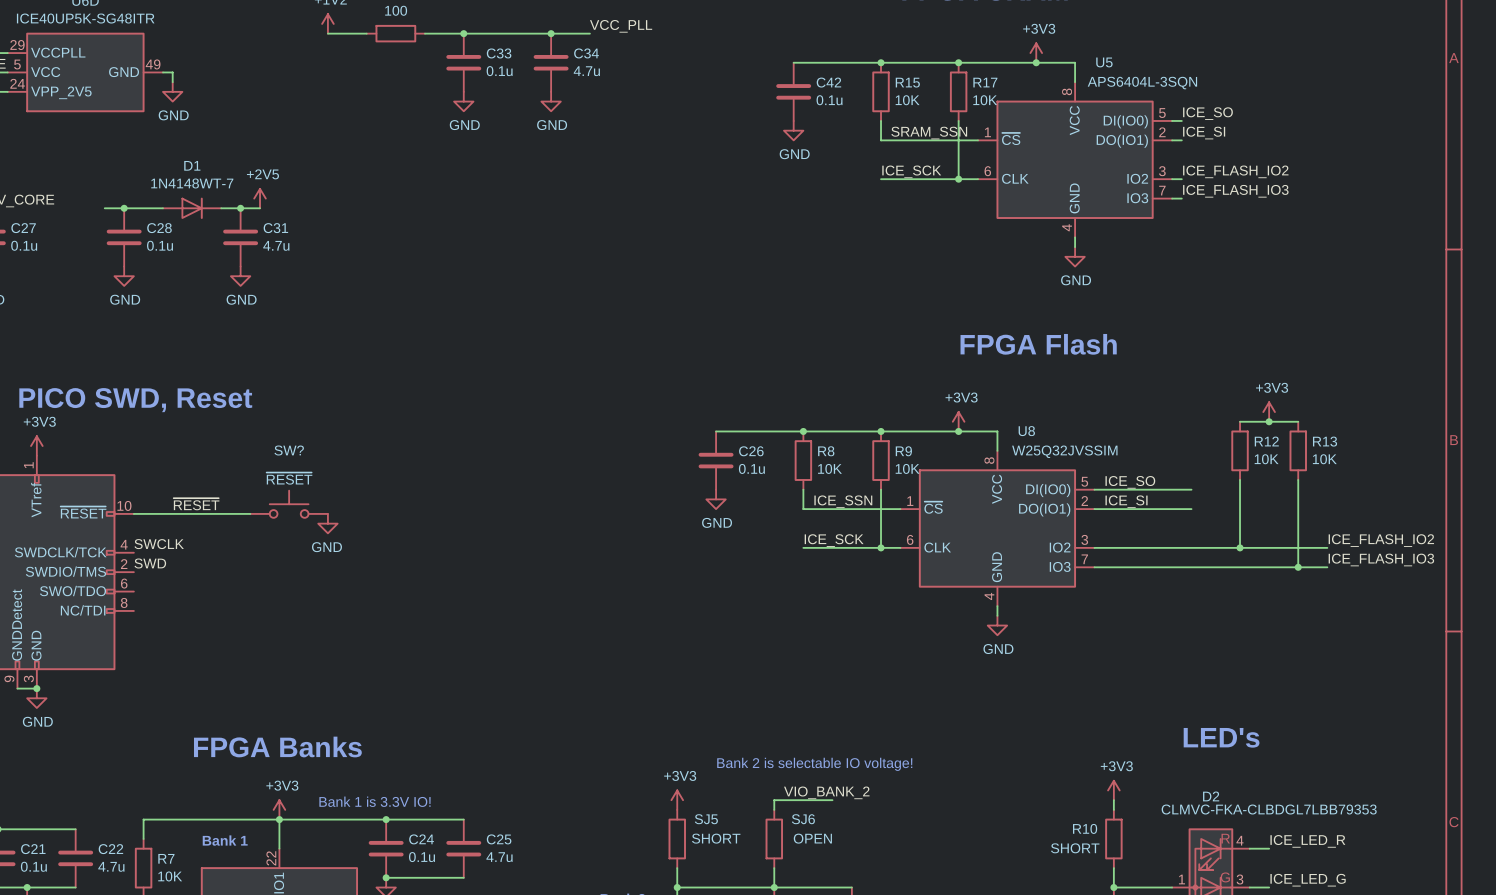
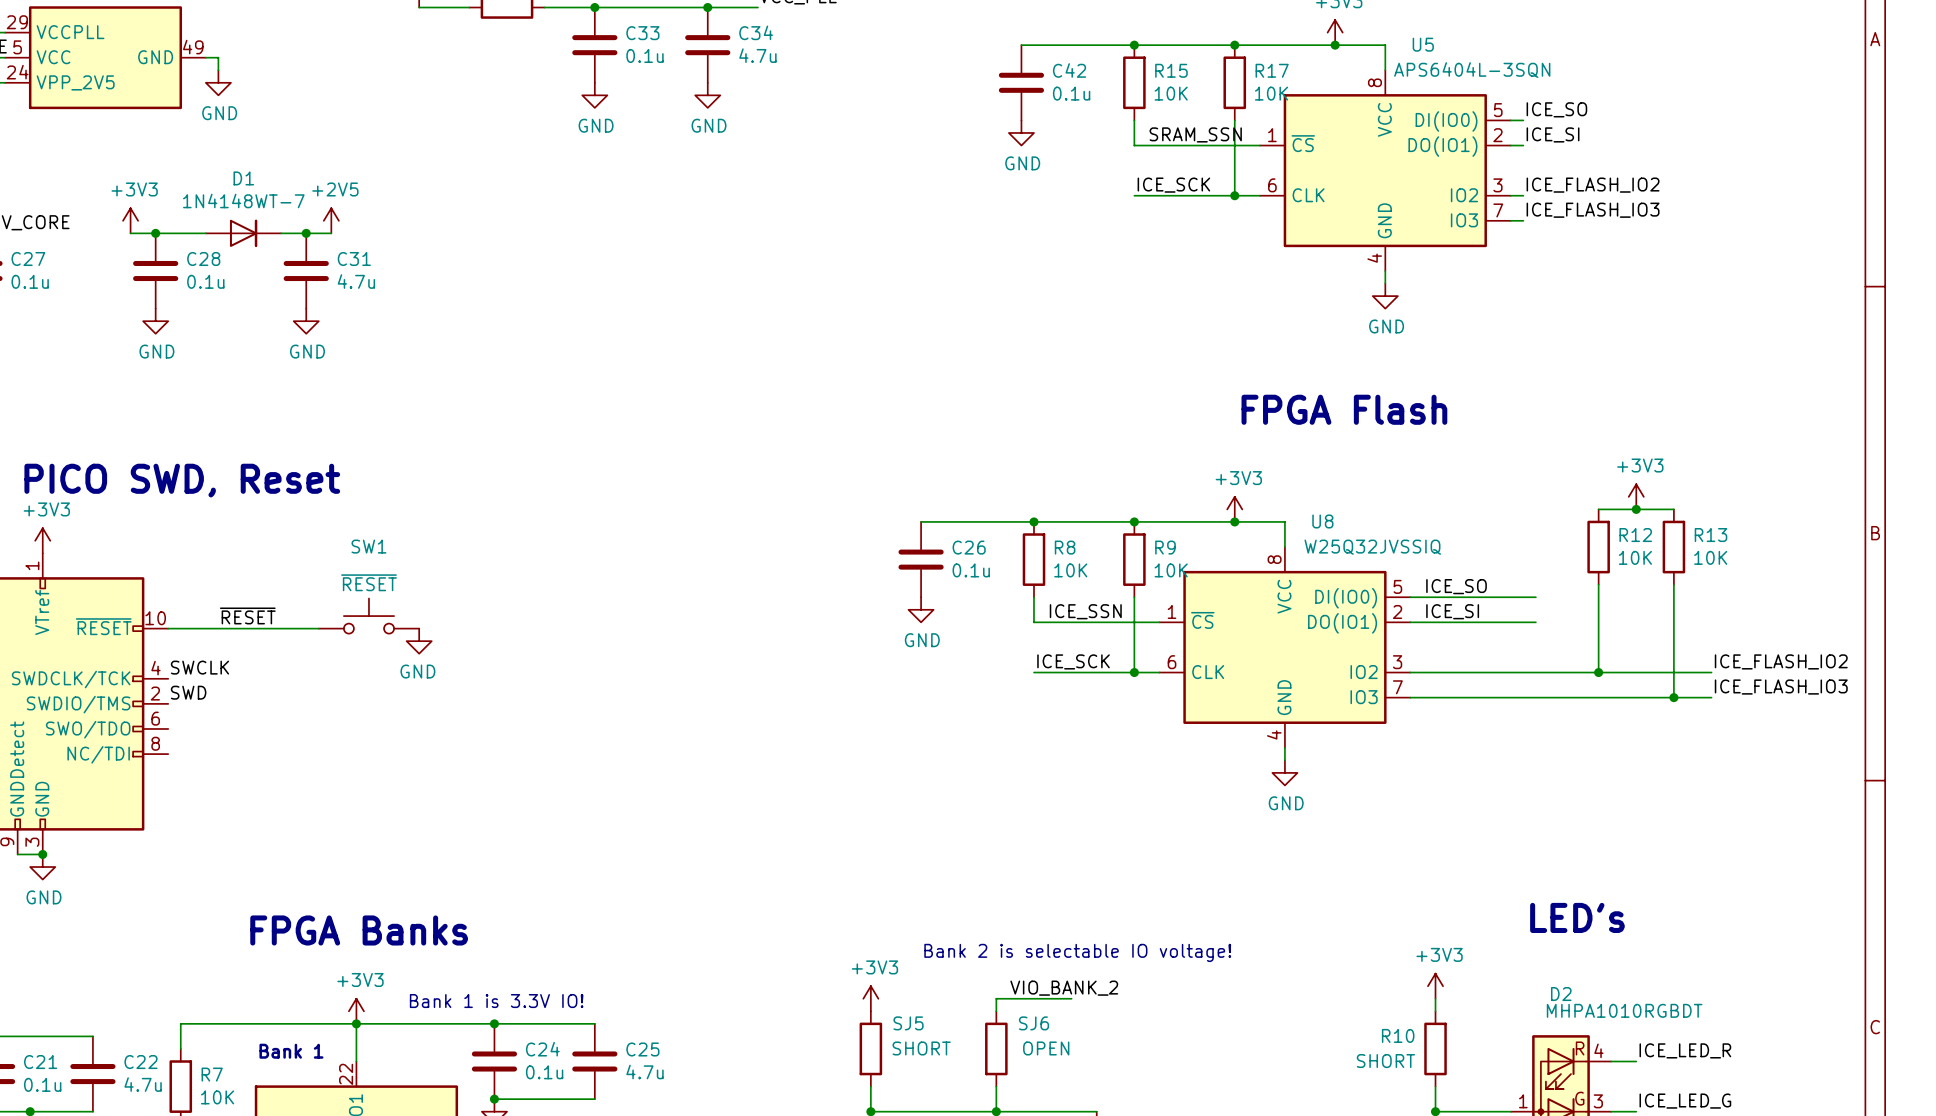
power symbol: none -> +3V3 (130, 220)
SW? name: SW? (289, 450) -> SW1 (368, 546)
U8 value: W25Q32JVSSIM (1064, 451) -> W25Q32JVSSIQ (1372, 547)
D2 value: CLMVC-FKA-CLBDGL7LBB79353 (1269, 809) -> MHPA1010RGBDT (1624, 1010)

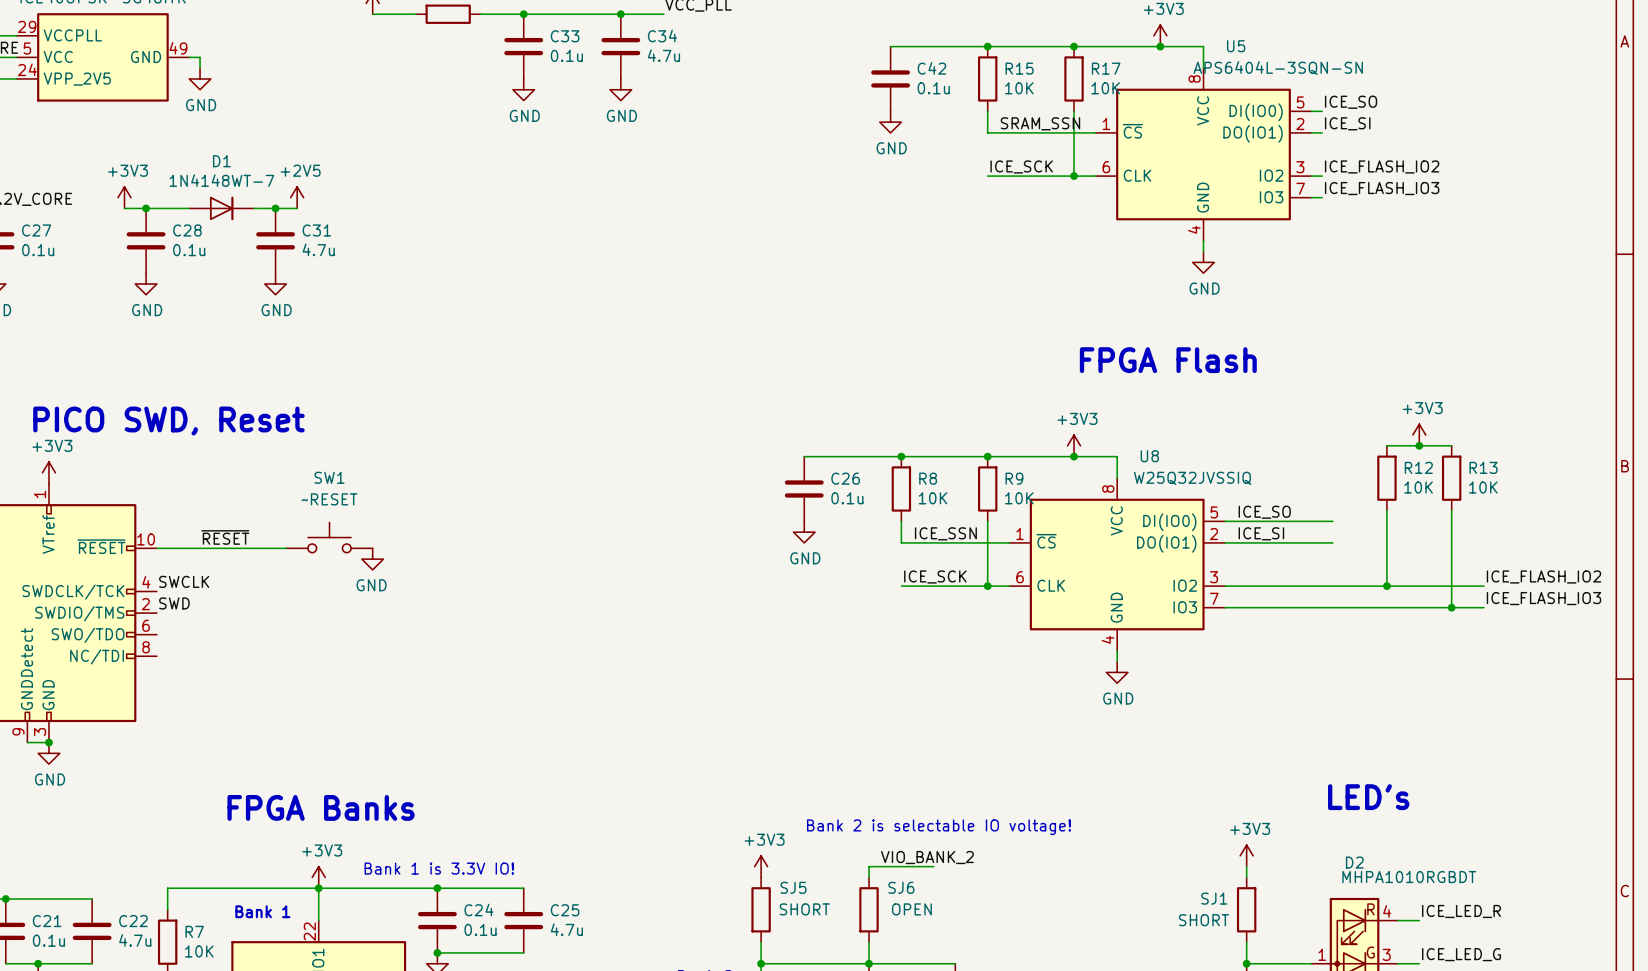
U5 value: APS6404L-3SQN (1472, 70) -> APS6404L-3SQN-SN (1278, 68)
SW1 text: none -> ~RESET (329, 499)
SW1 value: ~{RESET} (369, 582) -> none
R10 name: R10 (1398, 1035) -> SJ1 (1214, 898)

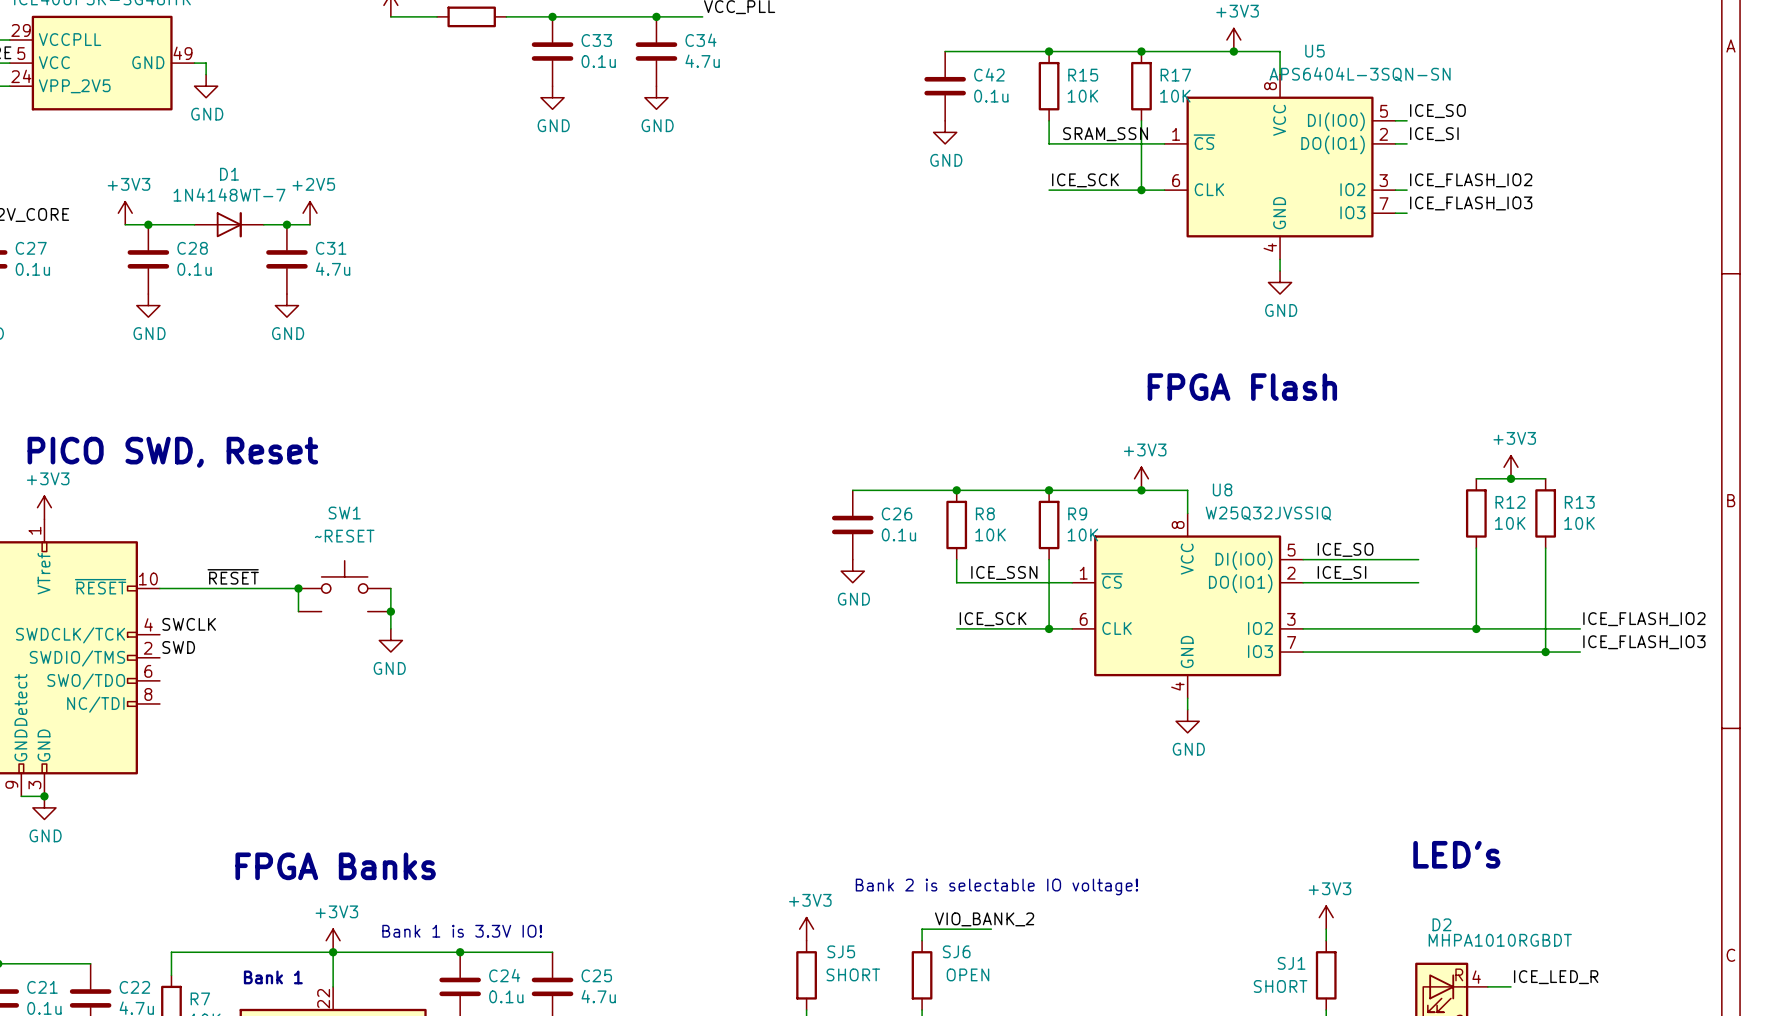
SW1 symbol: [286, 522, 373, 553] -> [298, 560, 391, 612]
wire: none -> (298, 588) (298, 611)
junction: none -> (298, 588)
wire: none -> (390, 588) (390, 628)
power symbol position: GND (372, 559) -> GND (390, 640)
junction: none -> (390, 611)

